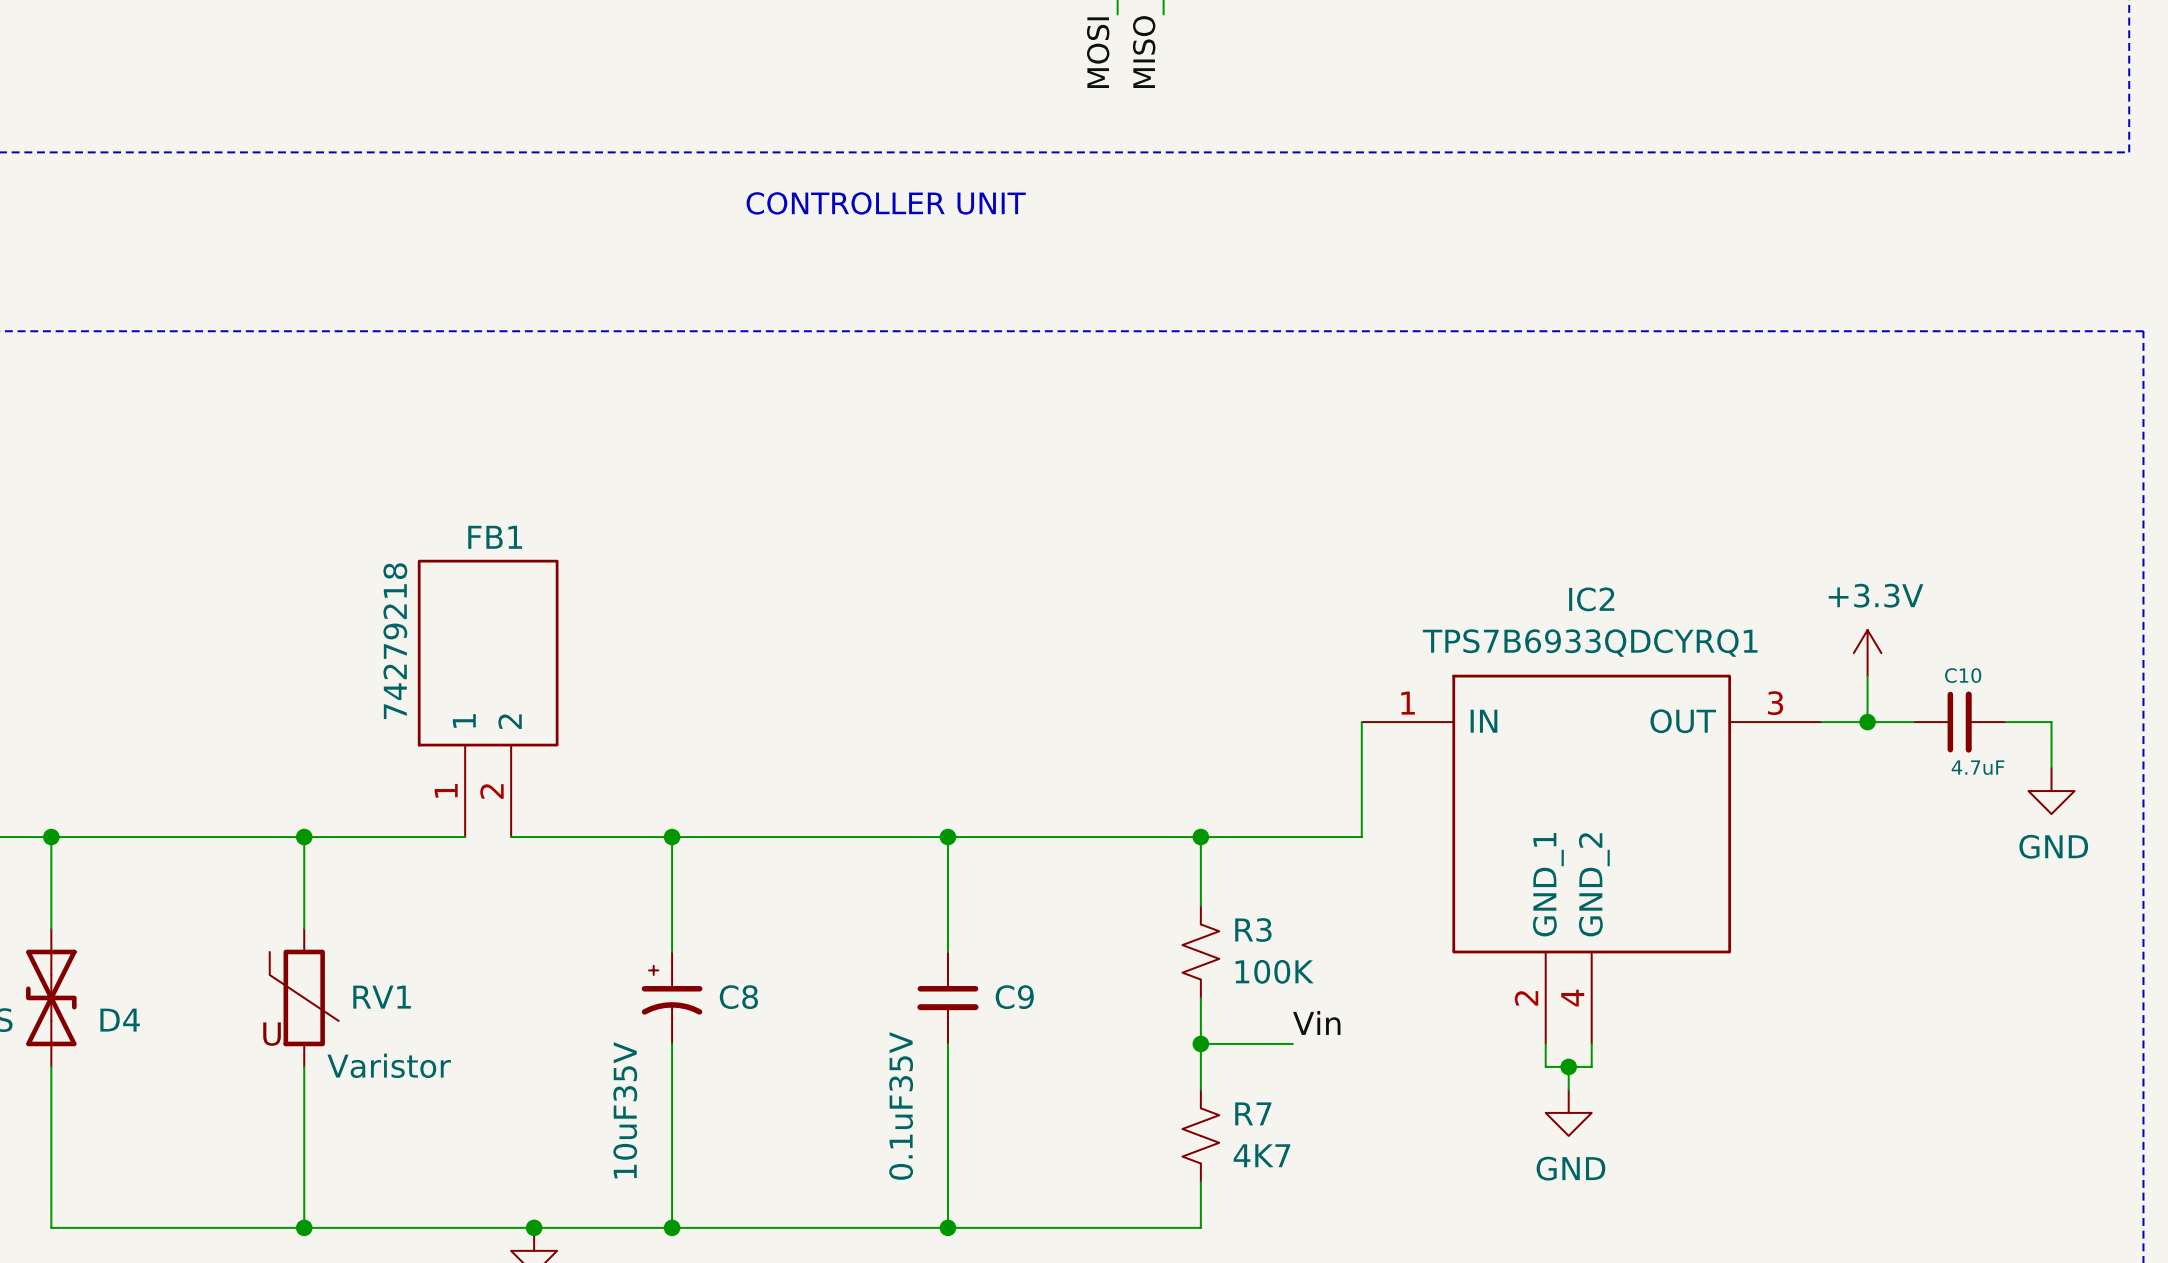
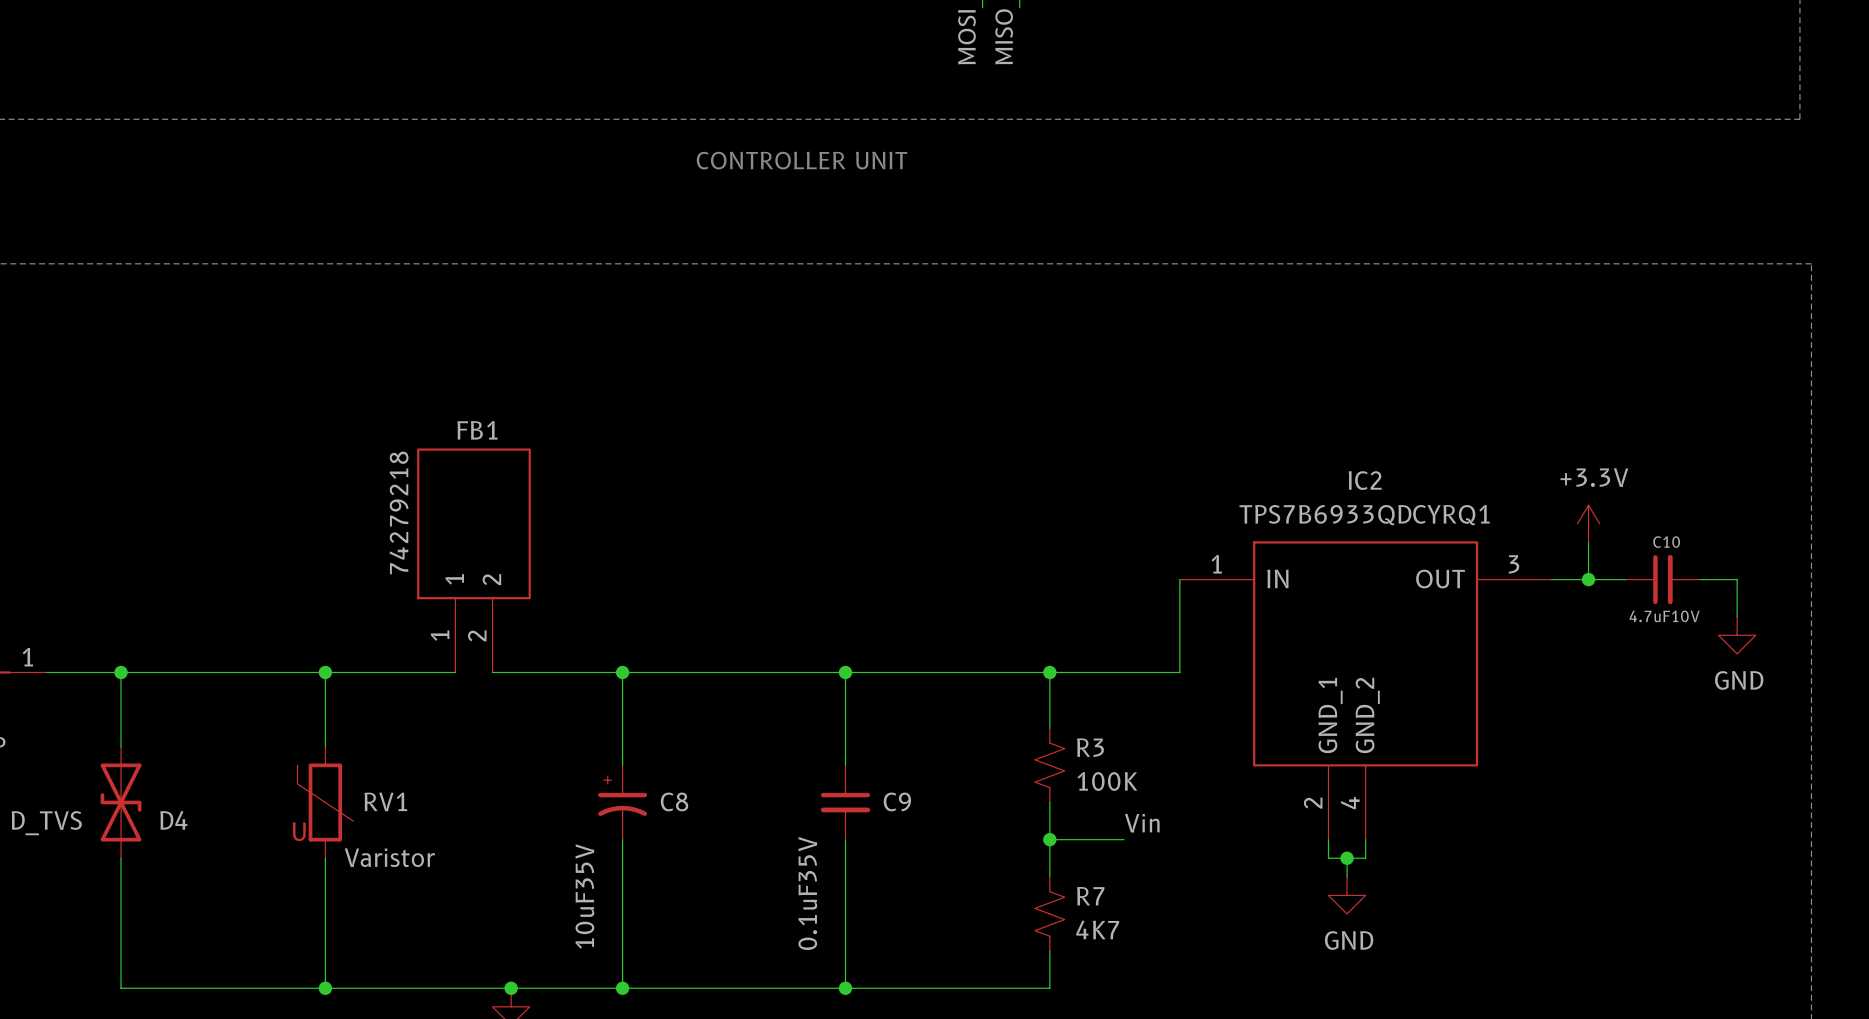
C10 value: 4.7uF (1978, 767) -> 4.7uF10V (1664, 616)

